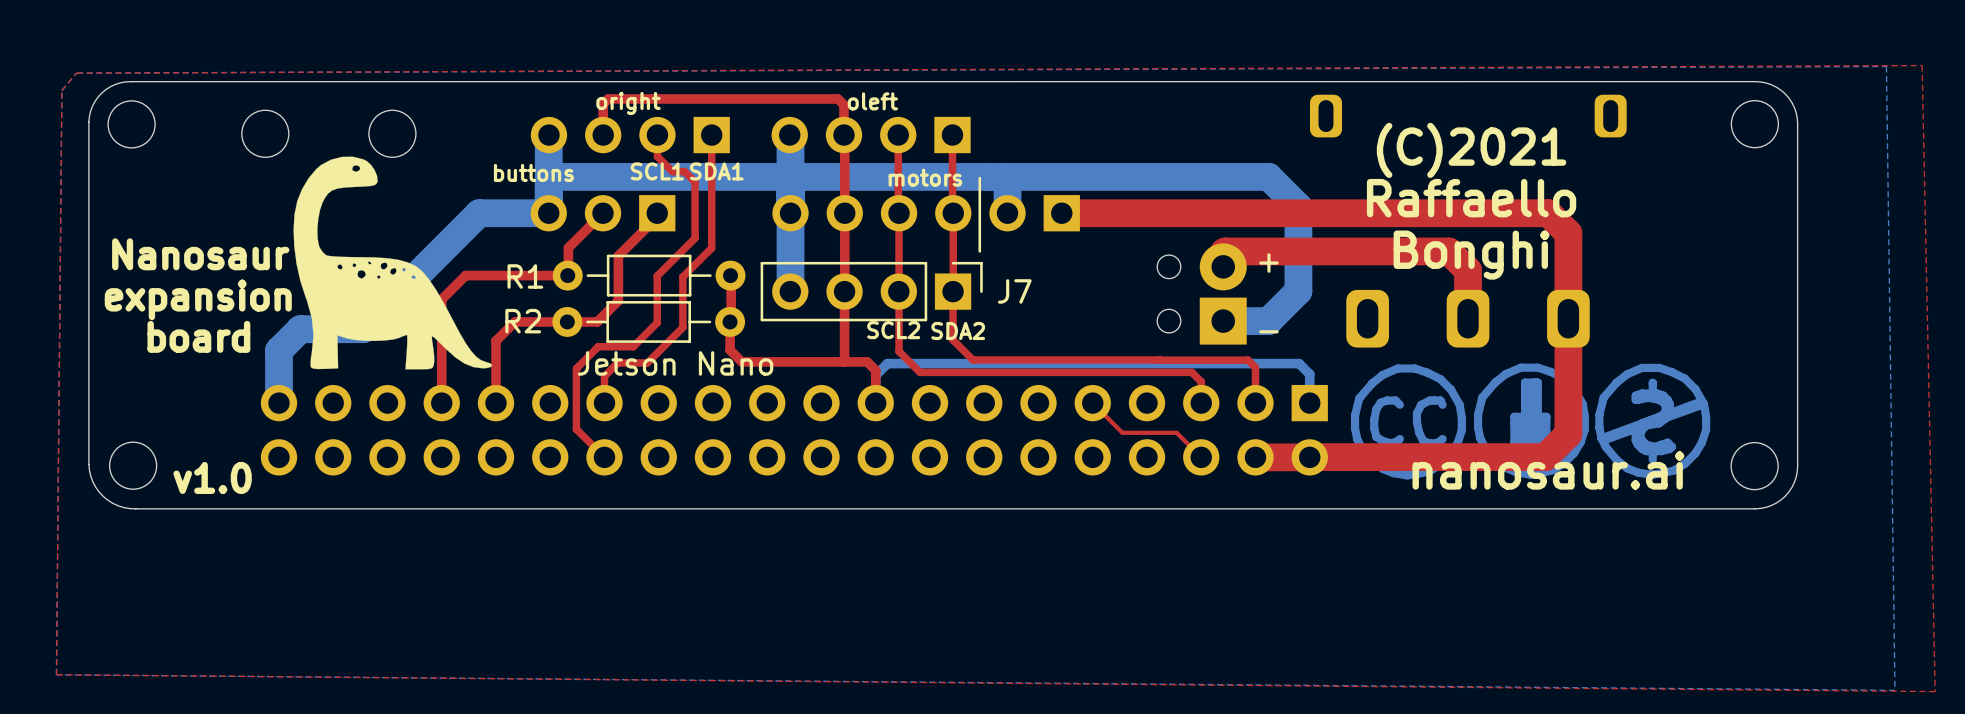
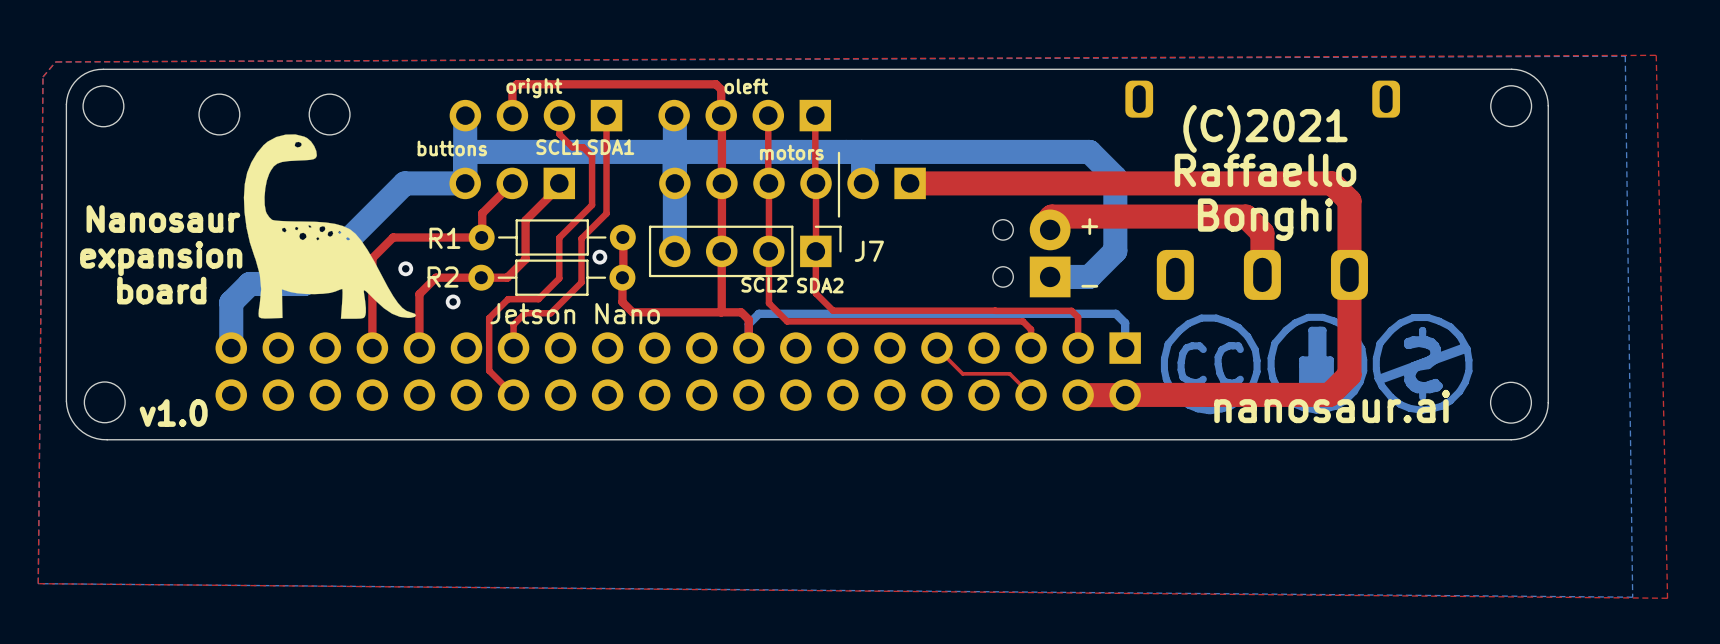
via: none -> (599, 257)
via: none -> (405, 268)
via: none -> (453, 301)

